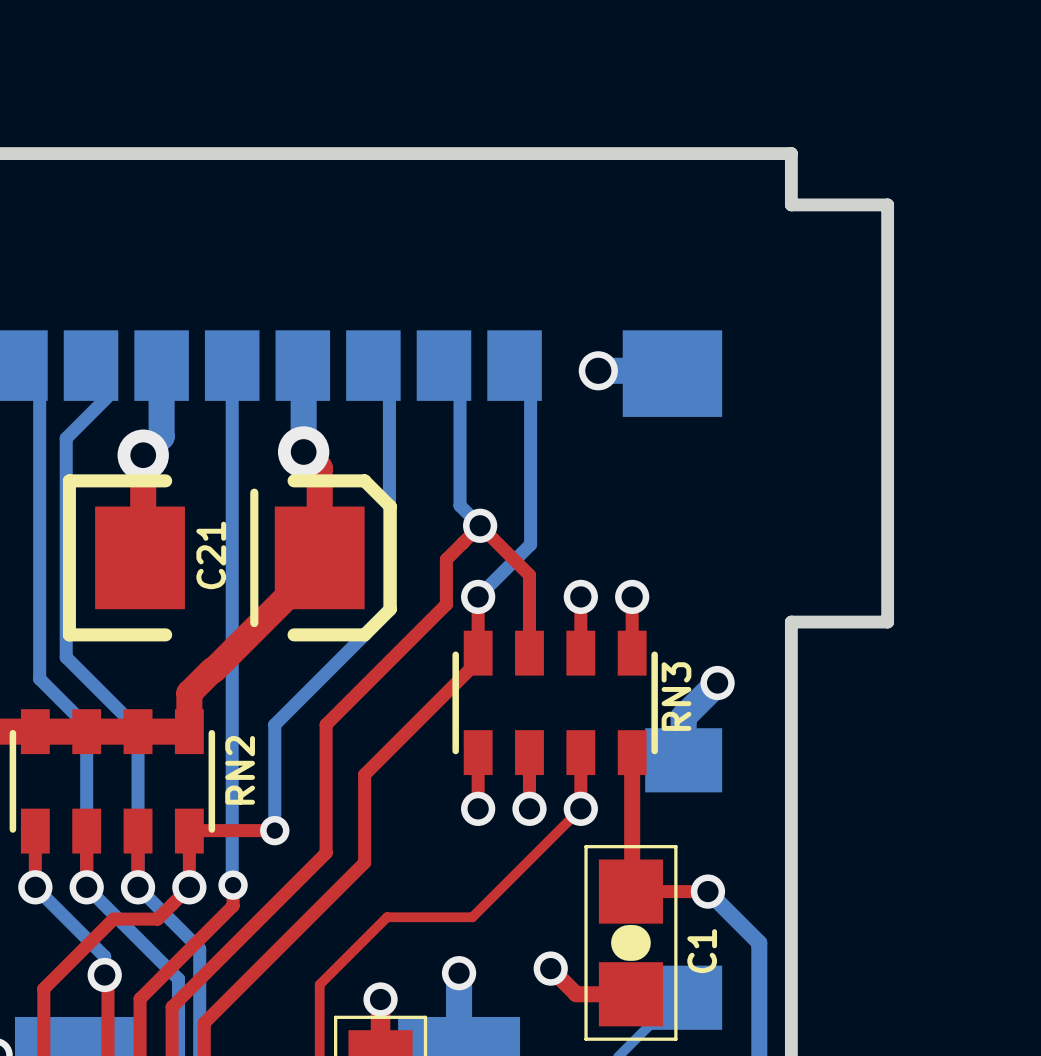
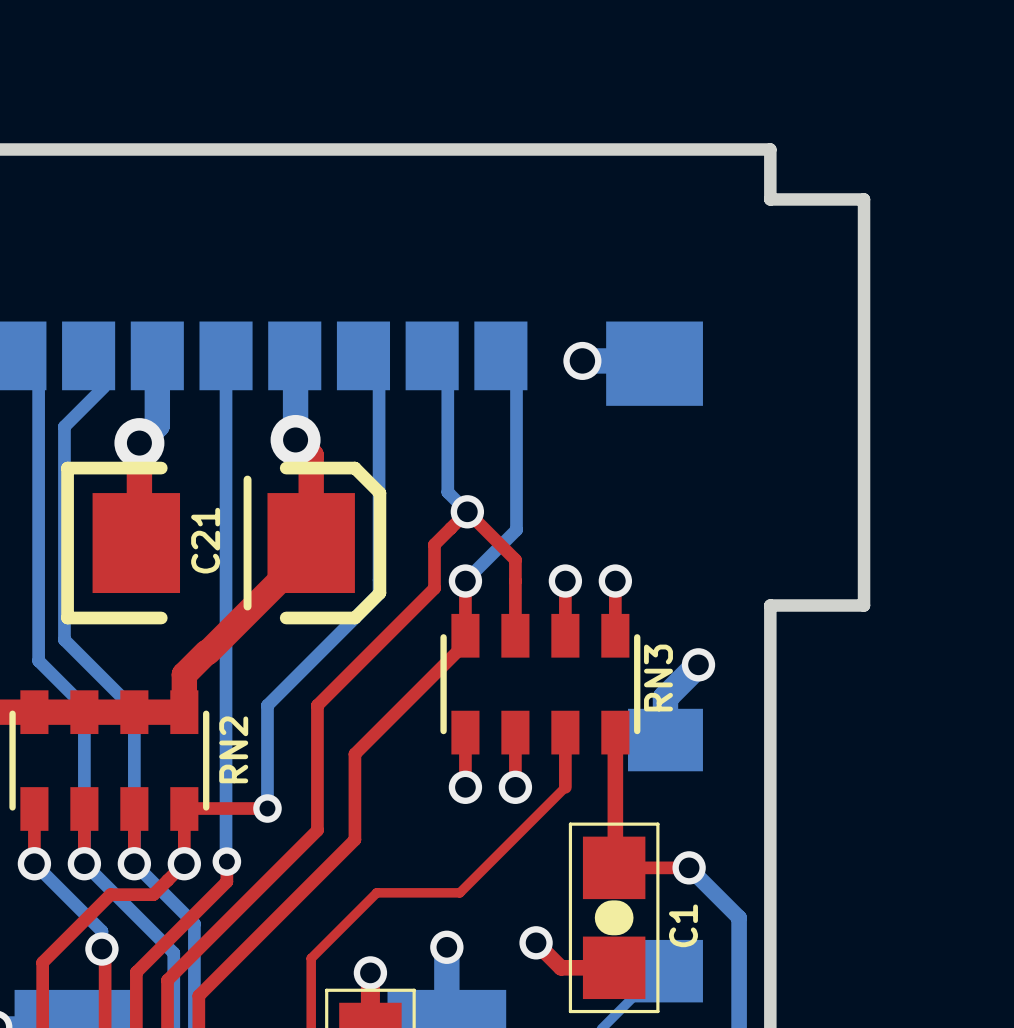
via: (580, 808) -> none

